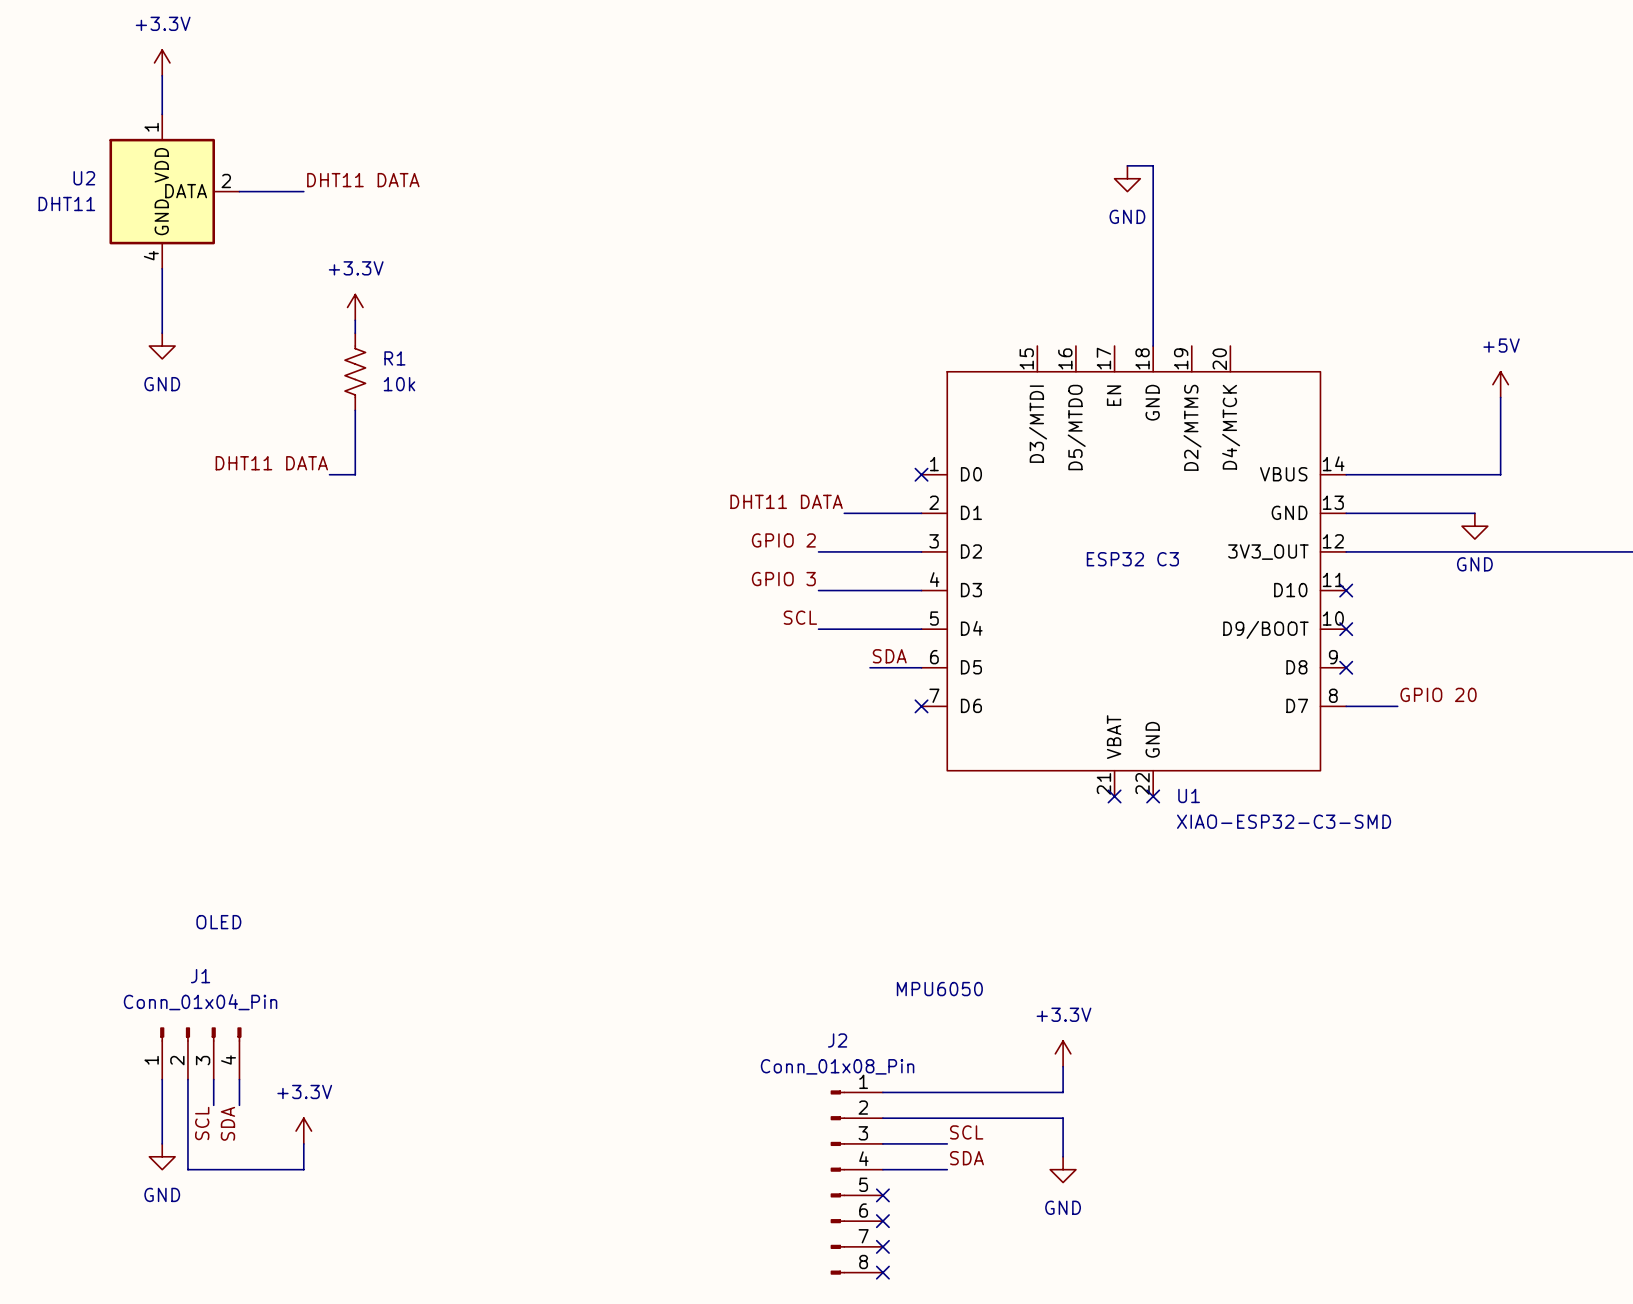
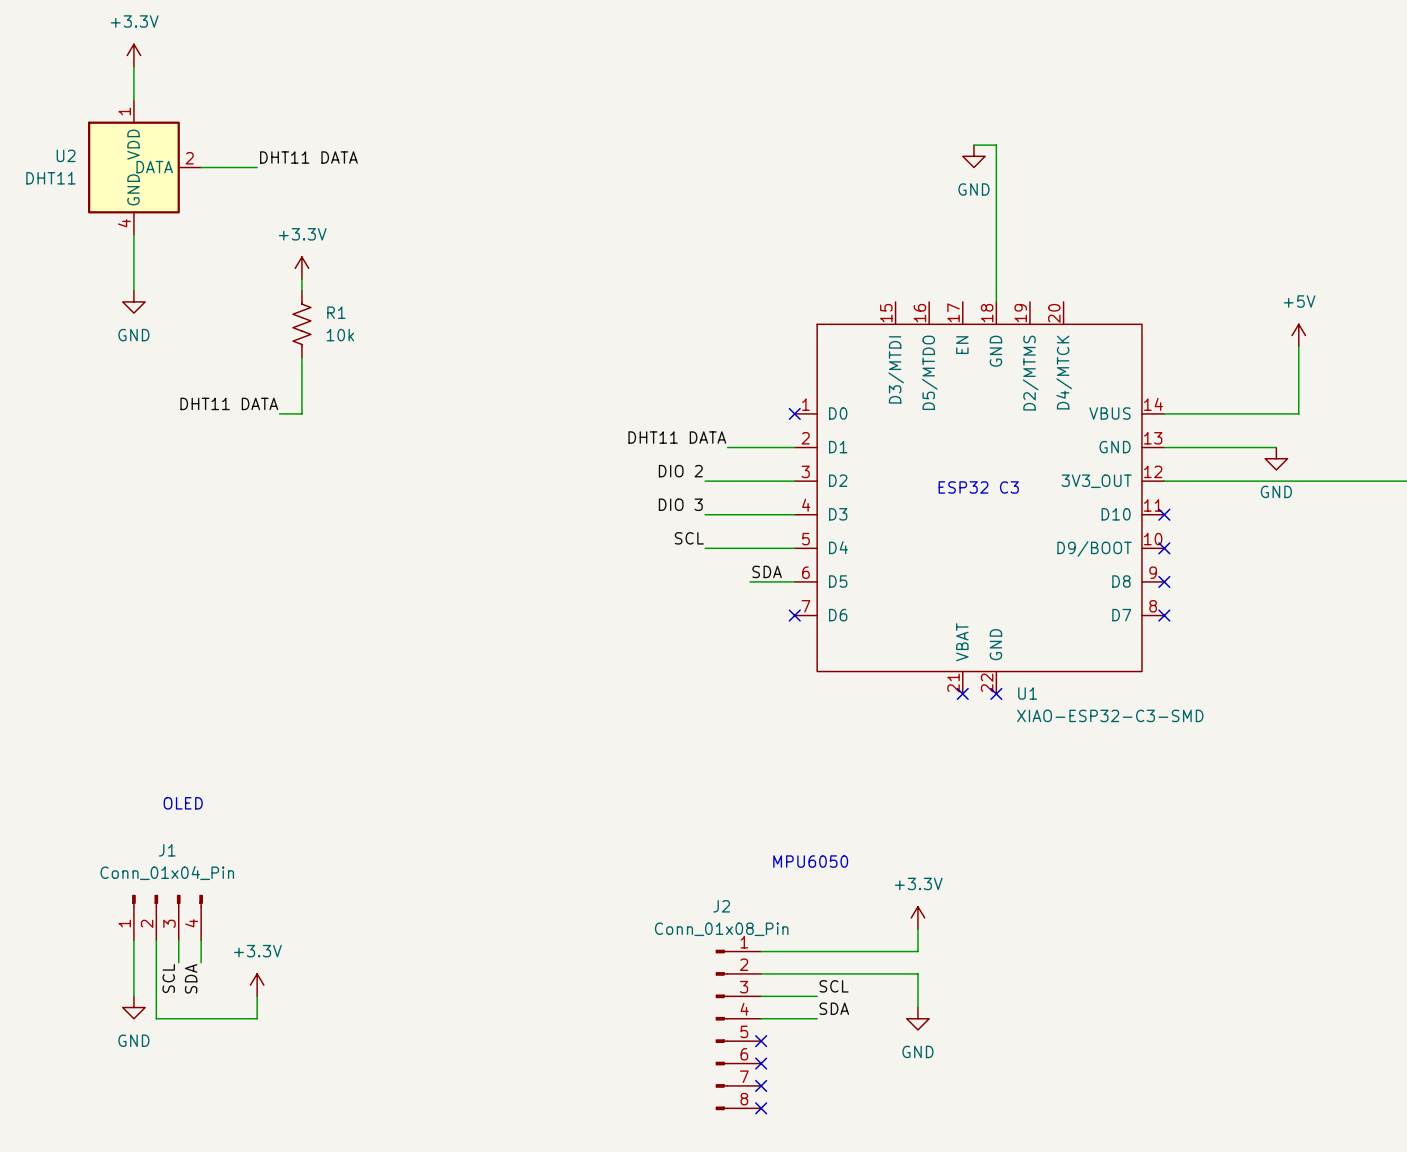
label: GPIO 2 (783, 540) -> DIO 2 (680, 471)
label: GPIO 3 (783, 579) -> DIO 3 (680, 504)
label: GPIO 20 (1438, 694) -> none
wire: (1346, 706) (1397, 706) -> none
no-connect mark: none -> (1164, 615)

